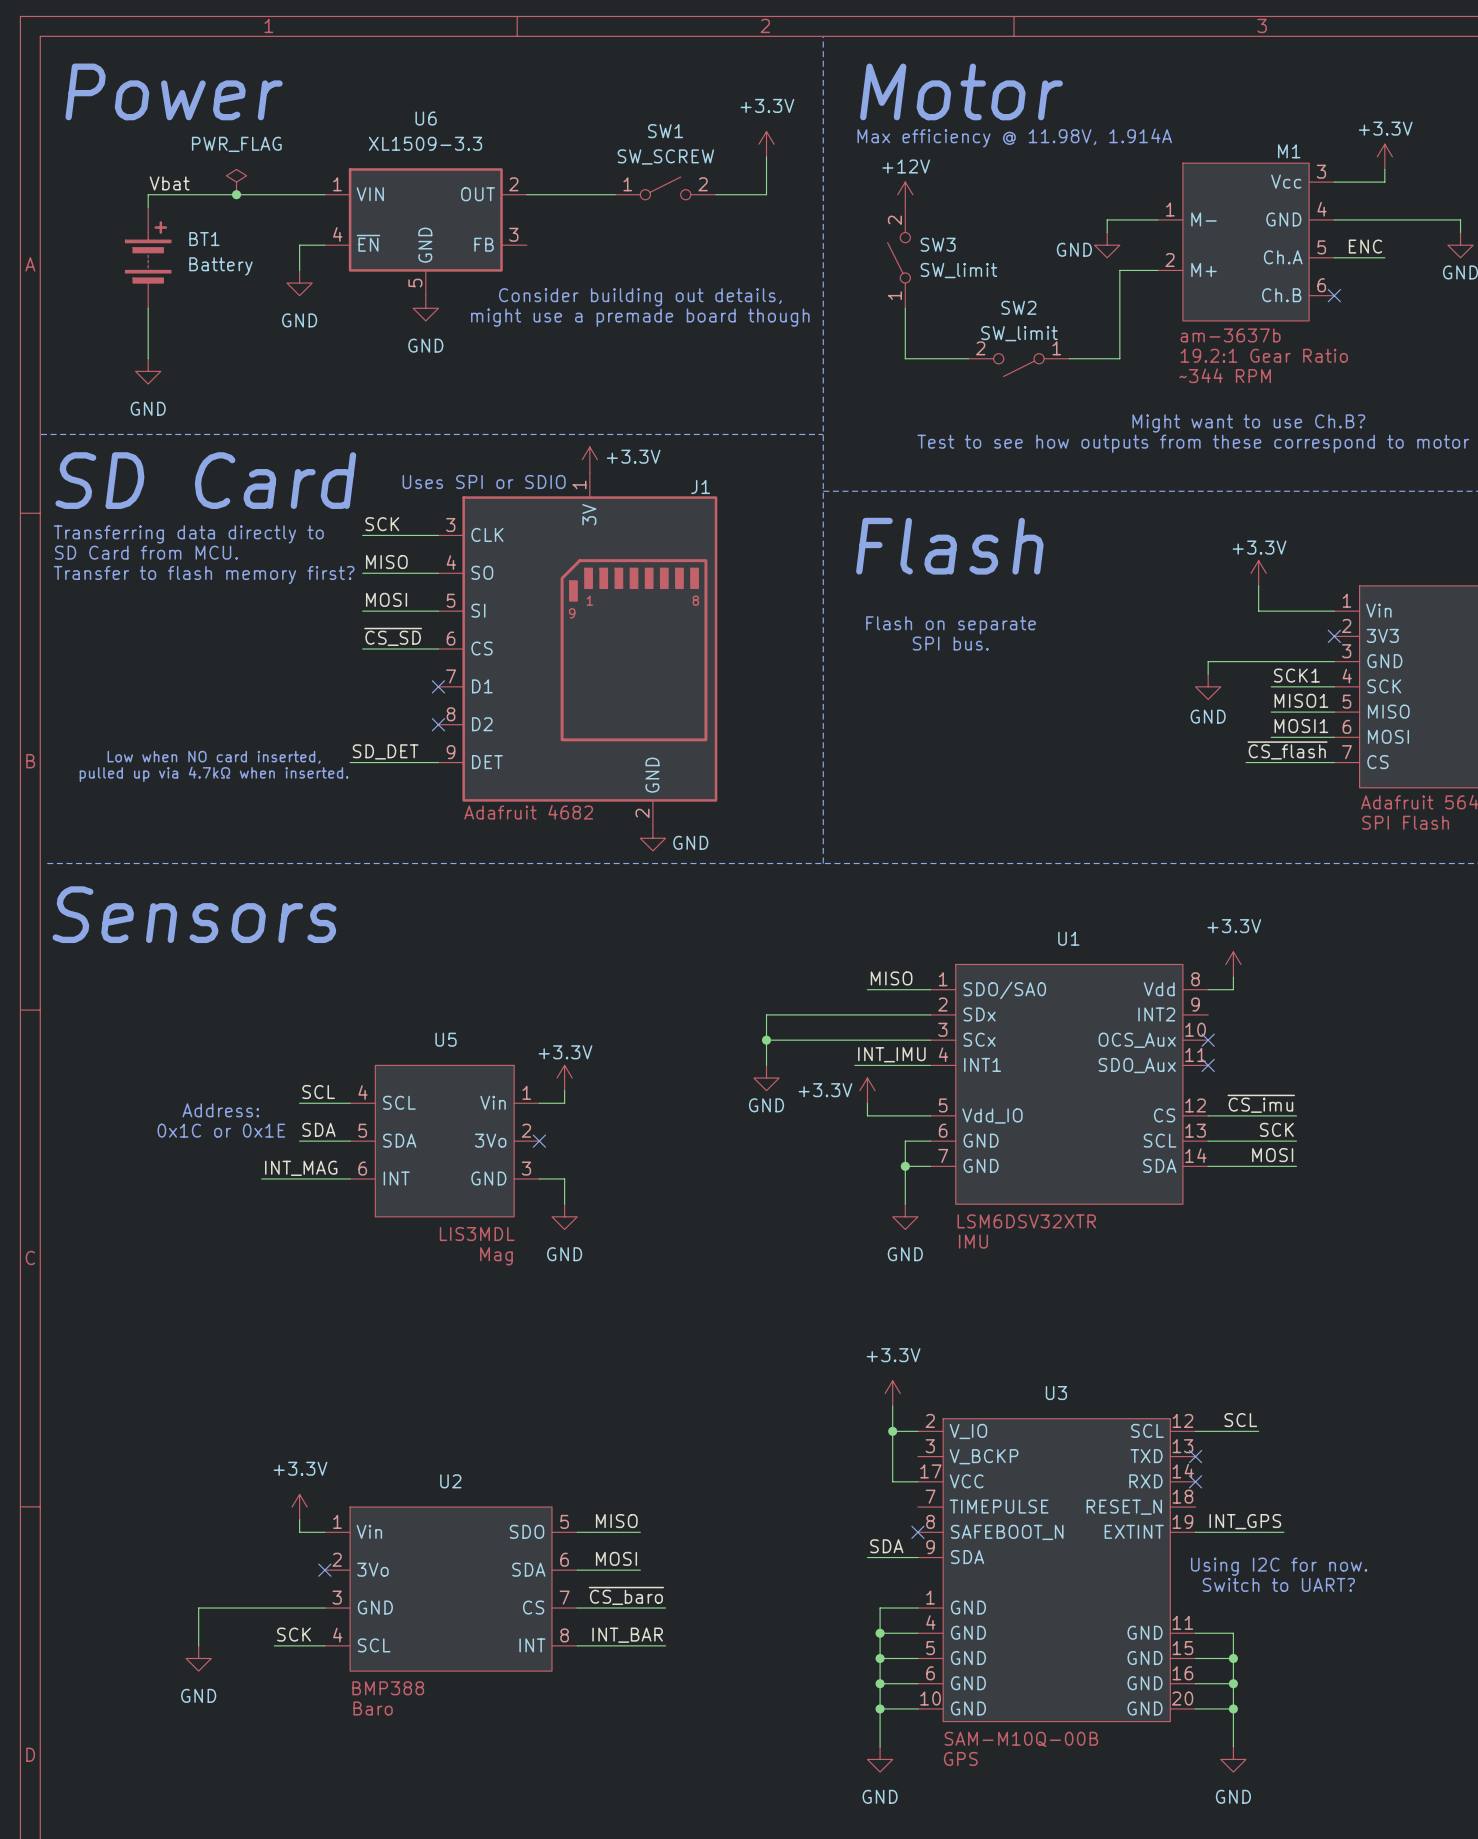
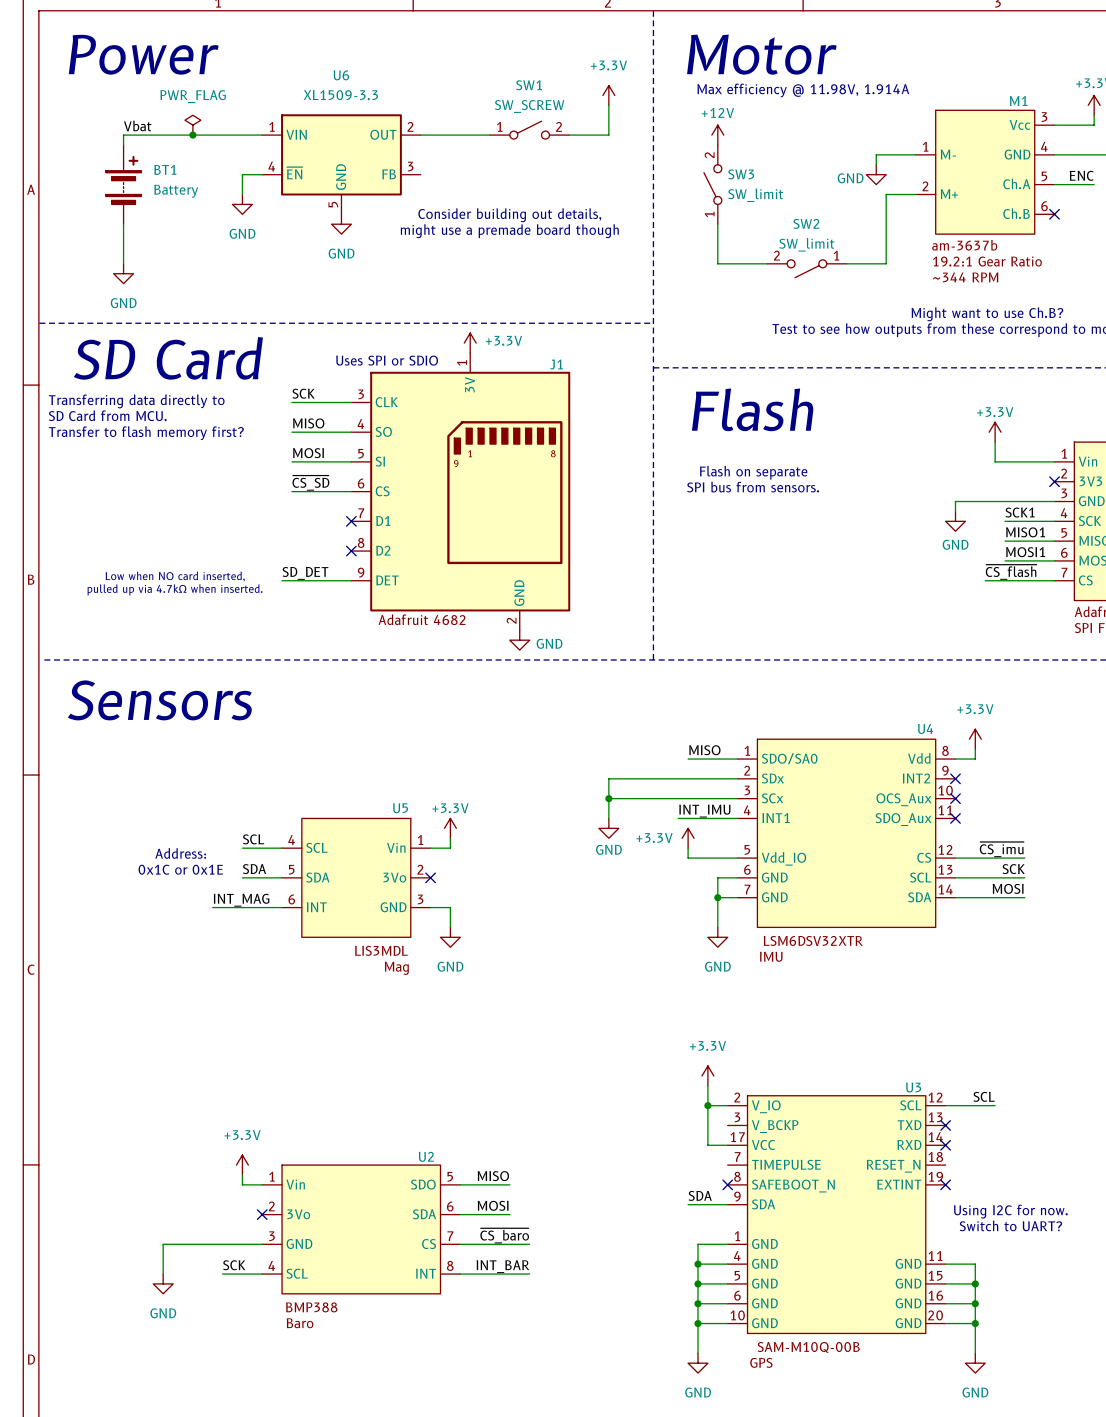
text: SPI bus. (950, 643) -> SPI bus from sensors. (753, 487)
U1 name: U1 (1068, 938) -> U4 (925, 728)
no-connect mark: none -> (955, 778)
U5 name position: U5 (446, 1039) -> U5 (400, 808)
U3 name position: U3 (1056, 1393) -> U3 (913, 1087)
U2 name position: U2 (450, 1481) -> U2 (426, 1156)
label: INT_GPS (1245, 1521) -> none
wire: (1195, 1532) (1283, 1532) -> none
no-connect mark: none -> (945, 1184)

